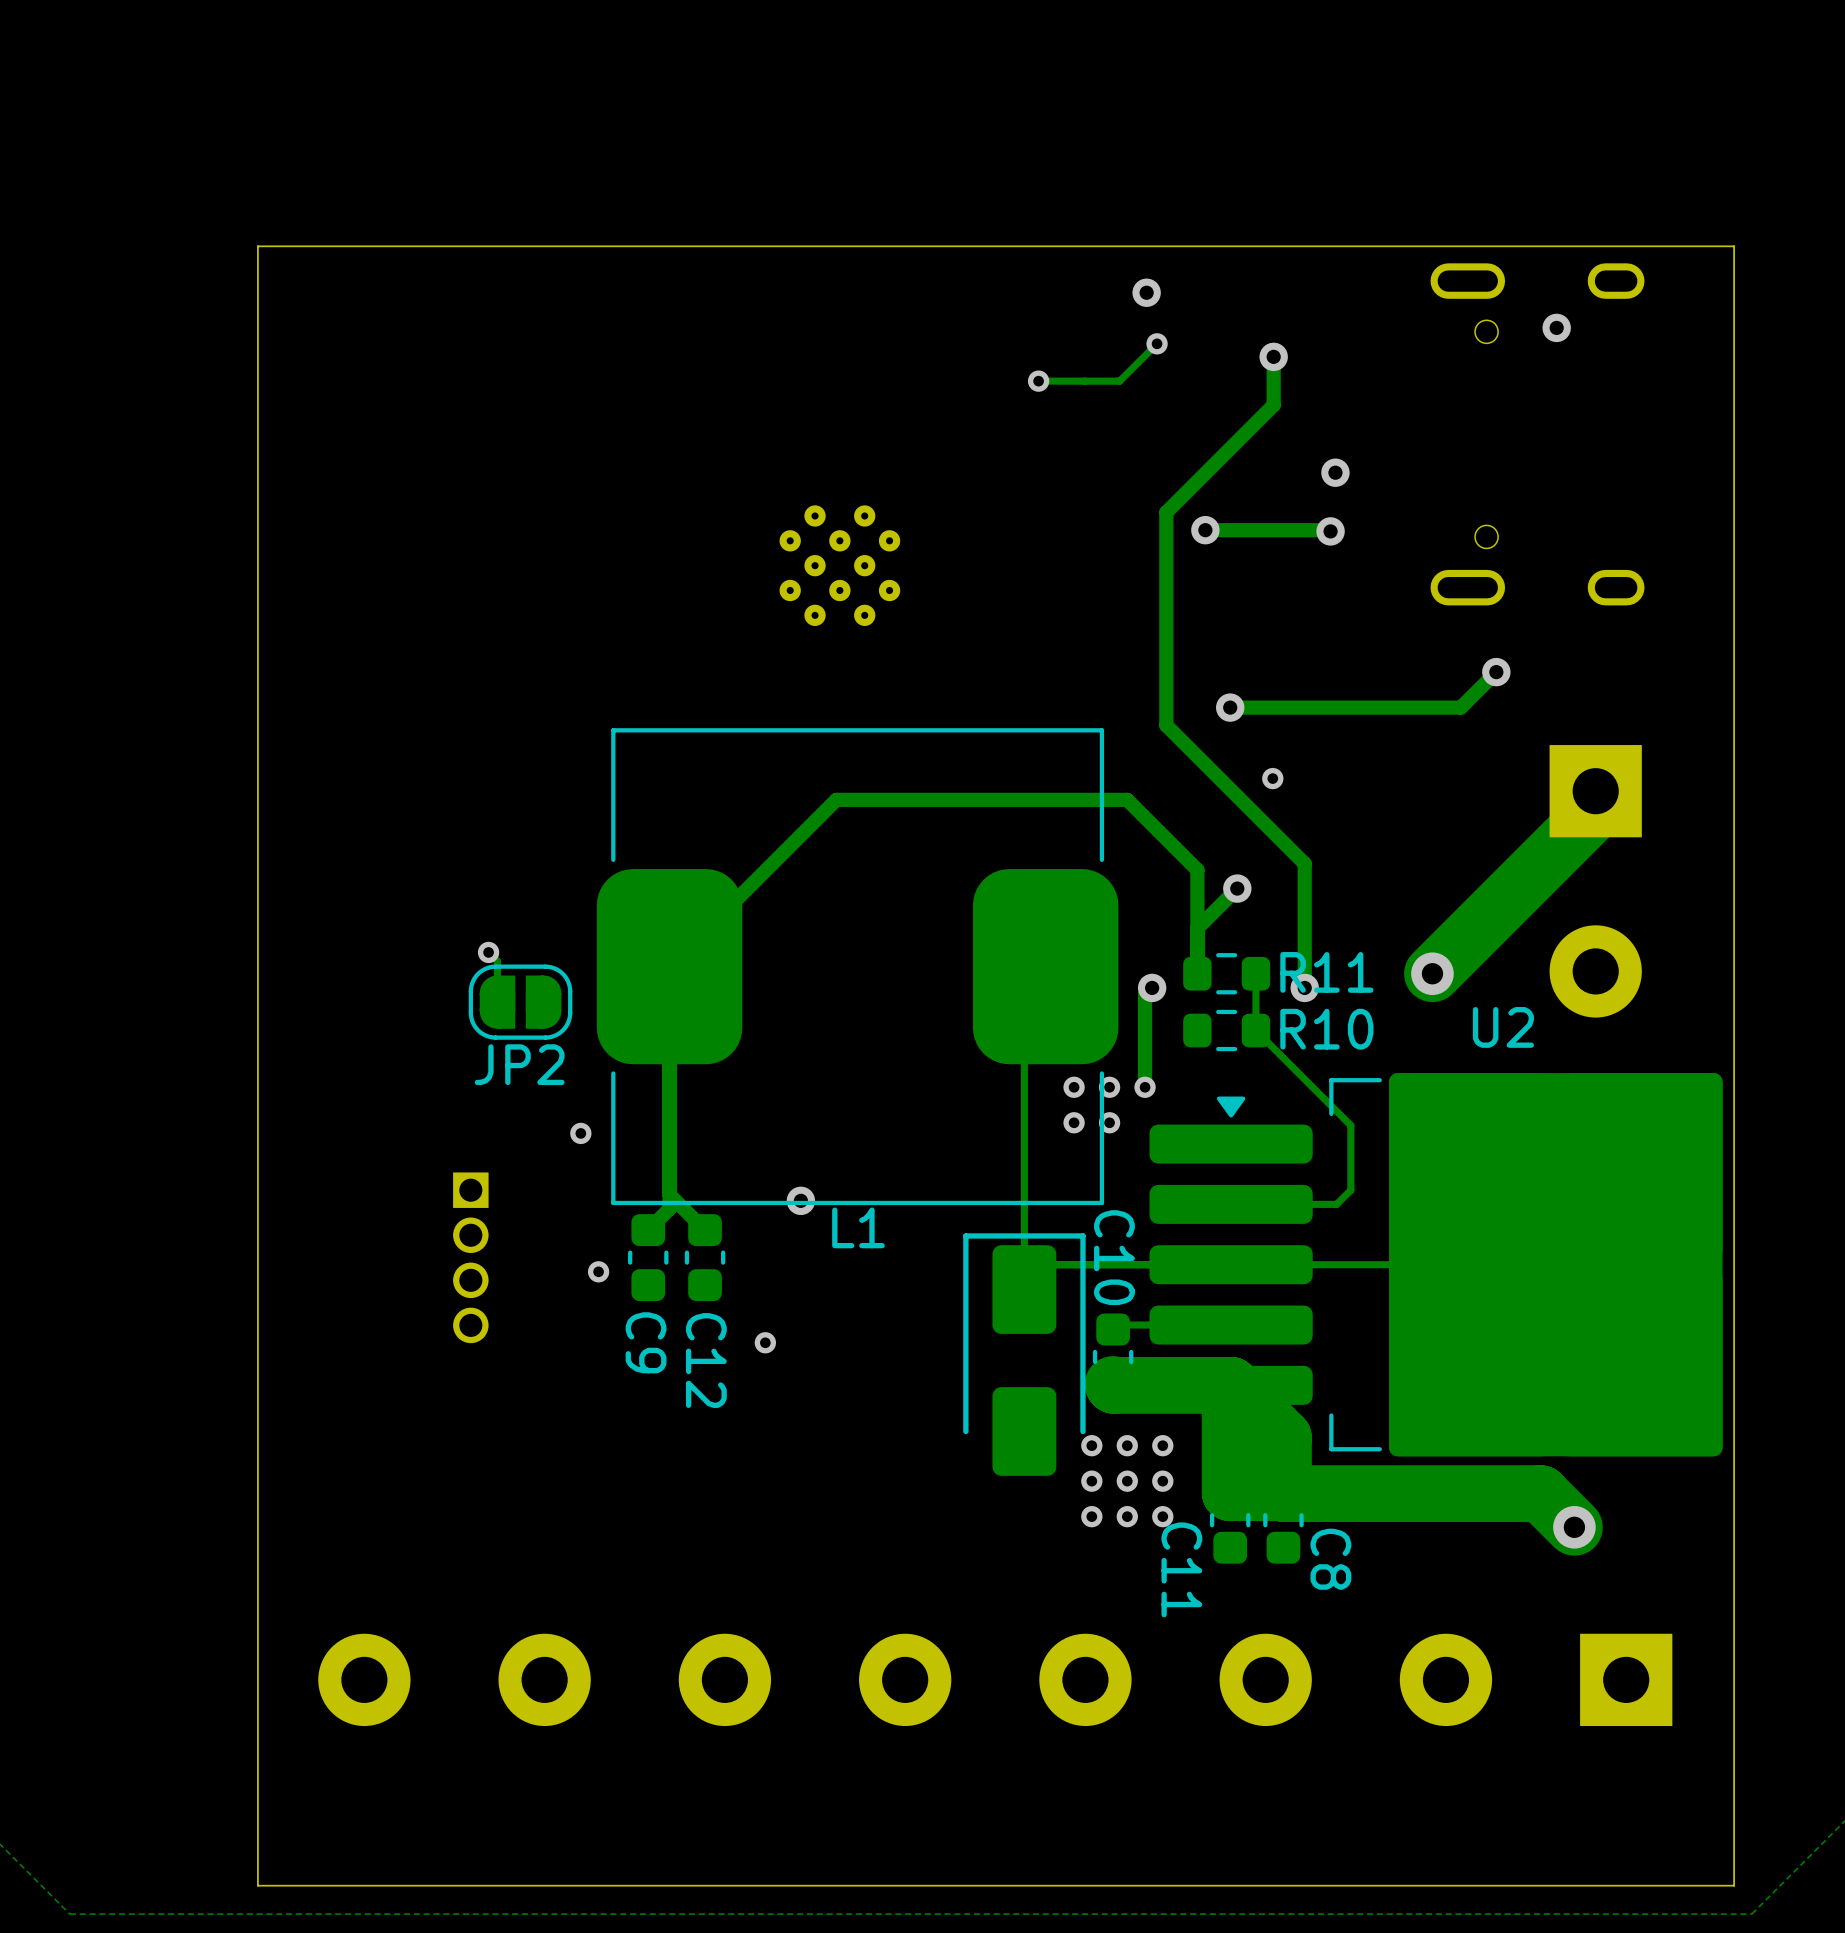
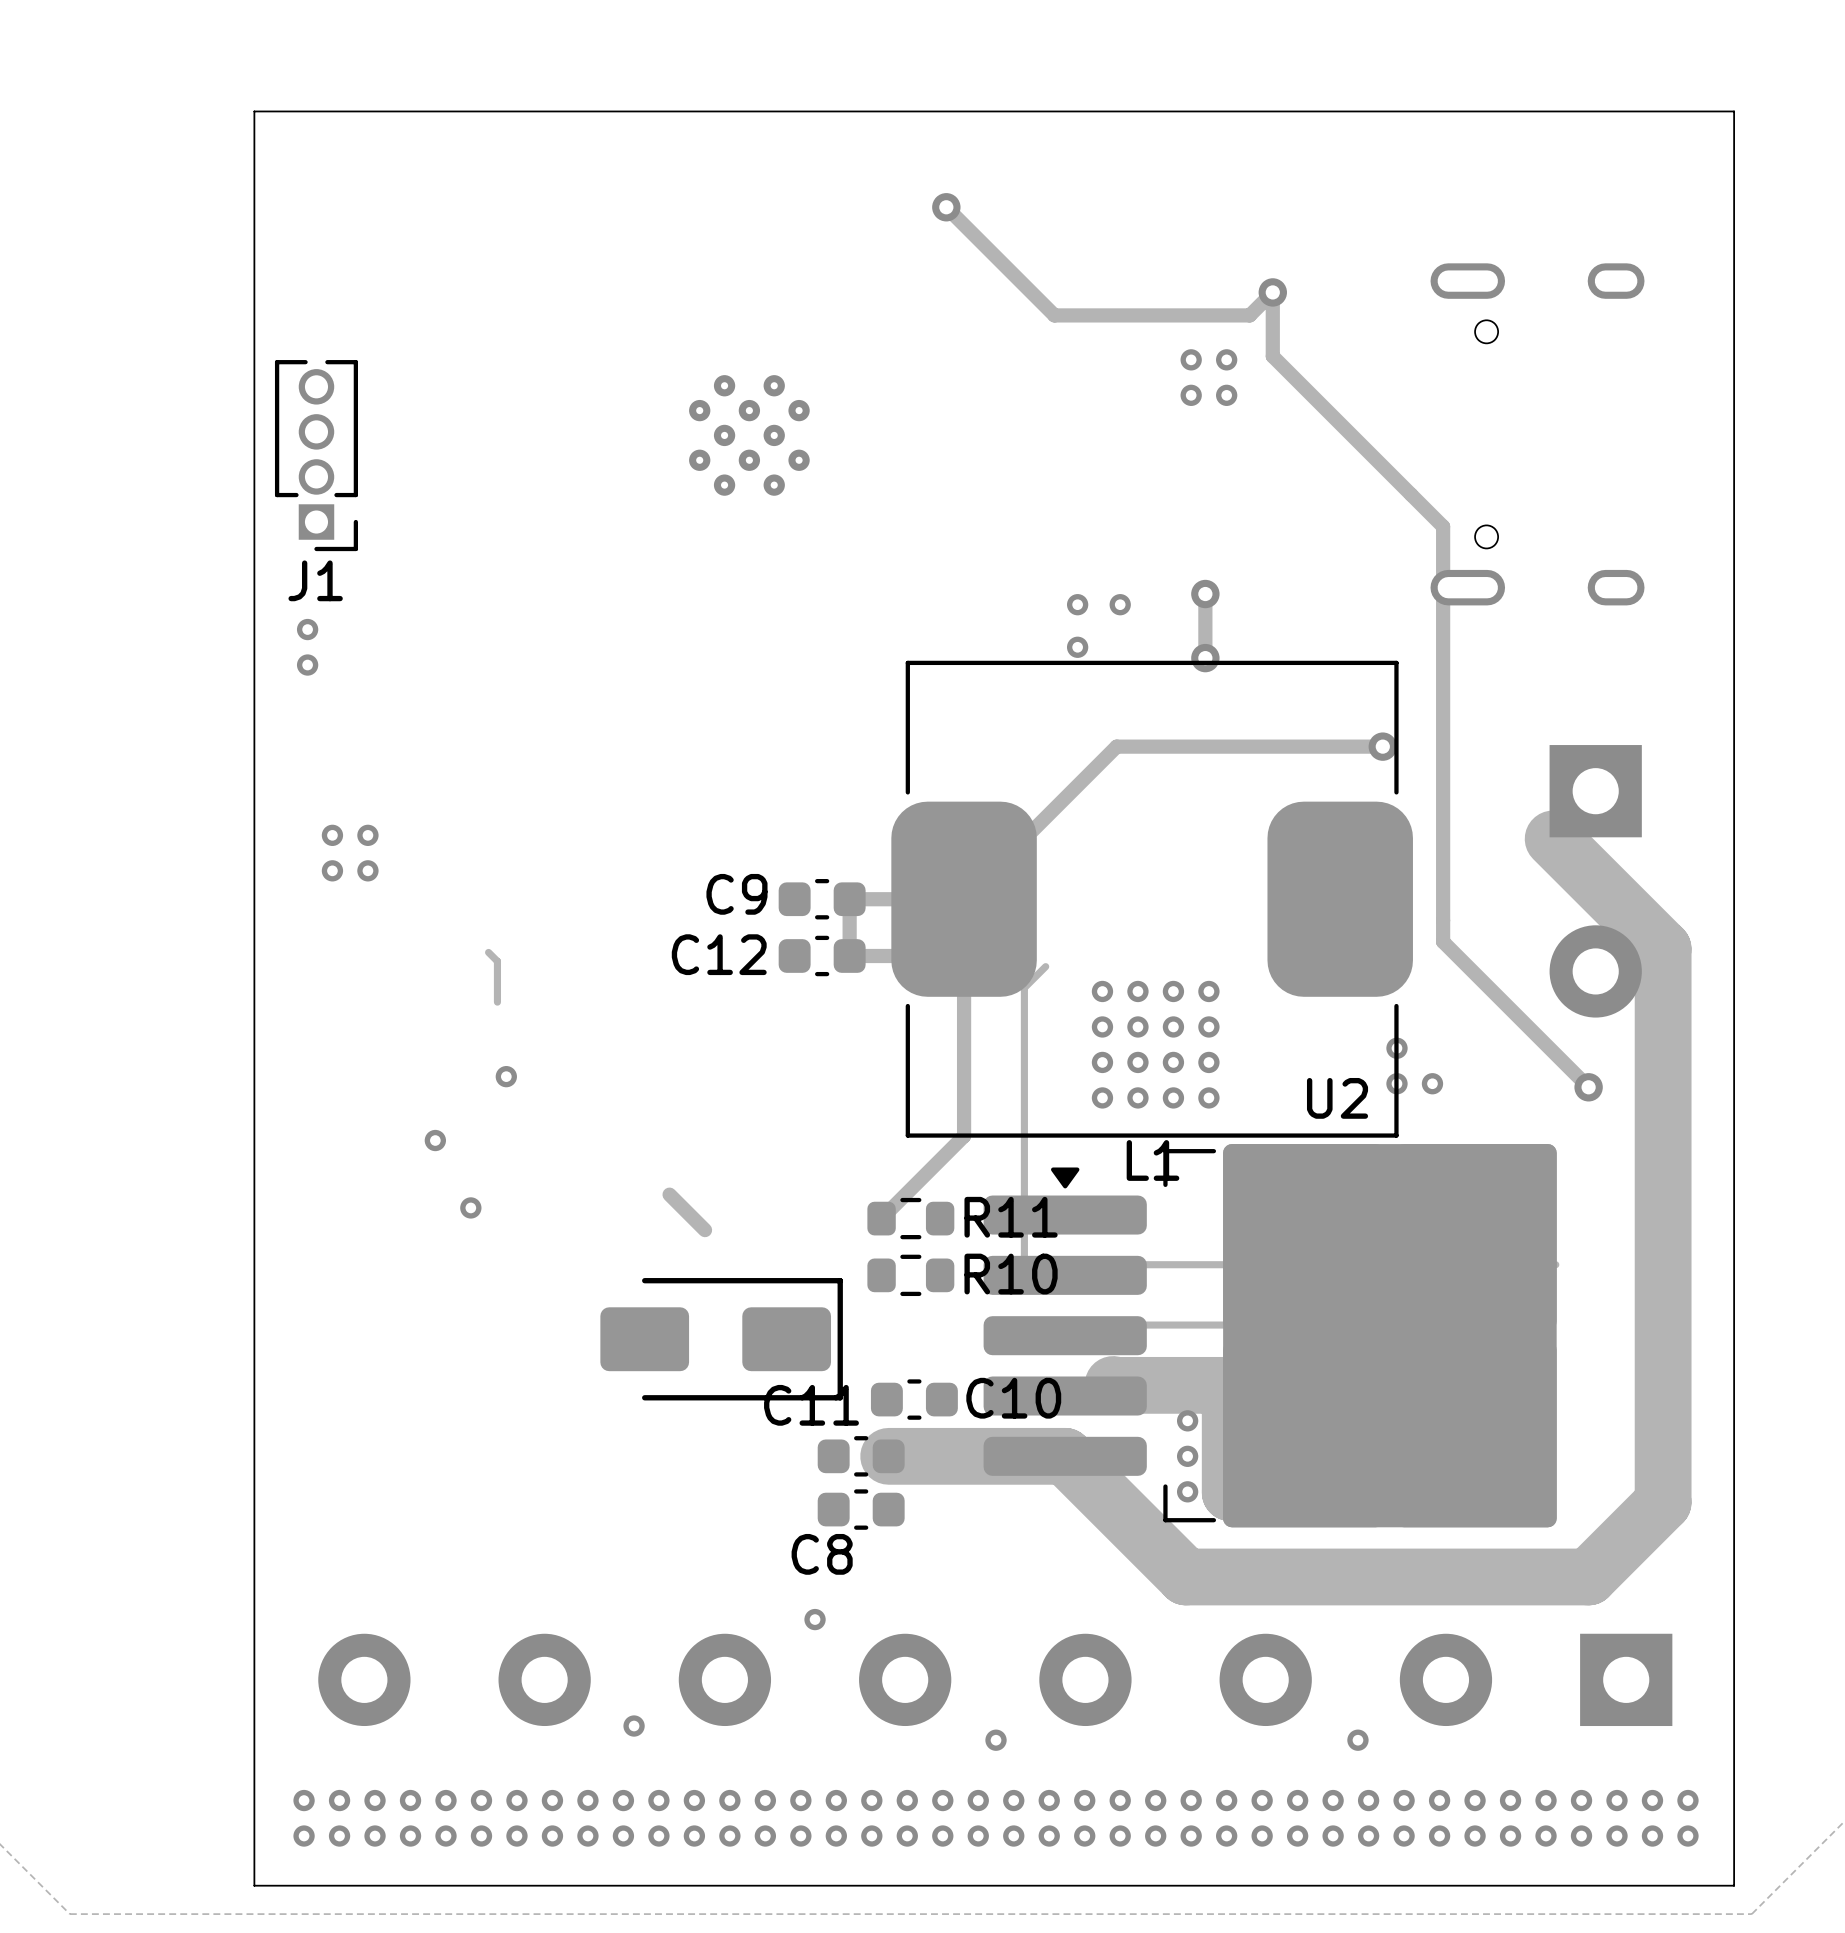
track: none -> (946, 207) (1054, 315) (1249, 315) (1272, 292) (1272, 356) (1443, 526) (1443, 941) (1588, 1087)
via: none -> (946, 207)
board edge: (1734, 246) (257, 246) (257, 1885) -> (1734, 246) (1734, 111) (254, 111) (254, 1885) (257, 1885)
via: (1146, 292) -> none
via: none -> (1272, 292)
via: (1556, 327) -> none
track: (1157, 343) (1119, 381) (1038, 381) -> none
via: (1157, 343) -> none
track: (1273, 356) (1273, 405) (1166, 512) (1166, 725) (1304, 863) (1304, 987) -> none
via: (1273, 356) -> none
via: none -> (1191, 359)
via: none -> (1226, 359)
via: (1038, 381) -> none
via: none -> (1191, 395)
via: none -> (1226, 395)
via: (1335, 472) -> none
track: (1205, 530) (1330, 531) -> none
via: (1205, 530) -> none
via: (1330, 531) -> none
part position: (839, 565) -> (749, 435)
track: none -> (1205, 594) (1205, 658)
via: none -> (1205, 594)
via: none -> (1077, 604)
via: none -> (1120, 604)
via: none -> (307, 629)
via: none -> (1077, 647)
via: none -> (307, 665)
track: (1496, 672) (1460, 707) (1230, 707) -> none
via: (1496, 672) -> none
via position: (1230, 707) -> (1205, 658)
track: none -> (1382, 746) (1116, 746) (907, 956) (849, 956) (849, 899) (964, 899) (964, 1136) (881, 1218)
via: none -> (1382, 746)
via: (1272, 778) -> none
track: (1595, 791) (1595, 810) (1432, 973) -> none
via: none -> (332, 835)
via: none -> (367, 835)
track: none -> (1553, 838) (1663, 948) (1663, 1502) (1588, 1576) (1185, 1576) (1065, 1456) (888, 1456)
via: none -> (332, 870)
via: none -> (367, 870)
track: (1237, 888) (1197, 928) -> none
via: (1237, 888) -> none
via: (488, 952) -> none
L1 position: (857, 966) -> (1152, 899)
track: (1197, 973) (1197, 869) (1127, 799) (836, 799) (669, 966) (669, 1208) (648, 1230) -> none
R11 position: (1226, 973) -> (910, 1218)
track: (1255, 973) (1255, 1030) (1350, 1125) (1350, 1190) (1336, 1204) (1231, 1204) -> none
via: (1432, 973) -> none
track: (1152, 987) (1145, 995) (1145, 1087) -> none
via: (1152, 987) -> none
via: (1304, 987) -> none
via: none -> (1102, 991)
via: none -> (1137, 991)
via: none -> (1173, 991)
via: none -> (1208, 991)
JP2: (520, 1002) -> none
via: none -> (1102, 1026)
via: none -> (1137, 1026)
via: none -> (1173, 1026)
via: none -> (1208, 1026)
R10 position: (1226, 1030) -> (910, 1275)
via: none -> (1396, 1048)
via: none -> (1102, 1062)
via: none -> (1137, 1062)
via: none -> (1173, 1062)
via: none -> (1208, 1062)
via: none -> (506, 1076)
via: none -> (1396, 1083)
via: none -> (1432, 1083)
via: (1074, 1087) -> none
via position: (1109, 1087) -> (1102, 1097)
via position: (1145, 1087) -> (1137, 1097)
via: none -> (1588, 1087)
via: none -> (1173, 1097)
via: none -> (1208, 1097)
via: (1074, 1122) -> none
via: (1109, 1122) -> none
via: (580, 1133) -> none
via: none -> (435, 1140)
via: (800, 1200) -> none
via: none -> (470, 1207)
J1 side: top (470, 1257) -> bottom (316, 455)
C9 rotation: 0° (648, 1257) -> 90° clockwise (822, 899)
C9 position: (648, 1257) -> (822, 899)
C12 rotation: 0° (705, 1257) -> 90° clockwise (822, 956)
C12 position: (705, 1257) -> (822, 956)
U2 position: (1436, 1264) -> (1270, 1335)
via: (598, 1271) -> none
via: (765, 1342) -> none
part rotation: 0° (1024, 1354) -> 90° clockwise (721, 1339)
part position: (1024, 1354) -> (721, 1339)
C10 rotation: 0° (1113, 1356) -> 90° clockwise (914, 1399)
C10 position: (1113, 1356) -> (914, 1399)
via: none -> (1187, 1420)
via: (1091, 1445) -> none
via: (1127, 1445) -> none
via: (1162, 1445) -> none
via: none -> (1187, 1456)
via: (1091, 1481) -> none
via: (1127, 1481) -> none
via: (1162, 1481) -> none
via: none -> (1187, 1491)
track: (1283, 1492) (1540, 1493) (1574, 1527) -> none
via: (1091, 1516) -> none
via: (1127, 1516) -> none
via: (1162, 1516) -> none
C11 rotation: 0° (1230, 1520) -> 90° clockwise (861, 1456)
C11 position: (1230, 1520) -> (861, 1456)
C8 rotation: 0° (1283, 1520) -> 90° clockwise (861, 1509)
C8 position: (1283, 1520) -> (861, 1509)
via: (1574, 1527) -> none
via: none -> (815, 1619)
via: none -> (634, 1726)
via: none -> (996, 1740)
via: none -> (1357, 1740)
via: none -> (304, 1800)
via: none -> (339, 1800)
via: none -> (375, 1800)
via: none -> (410, 1800)
via: none -> (446, 1800)
via: none -> (481, 1800)
via: none -> (516, 1800)
via: none -> (552, 1800)
via: none -> (587, 1800)
via: none -> (623, 1800)
via: none -> (658, 1800)
via: none -> (694, 1800)
via: none -> (729, 1800)
via: none -> (765, 1800)
via: none -> (800, 1800)
via: none -> (836, 1800)
via: none -> (871, 1800)
via: none -> (907, 1800)
via: none -> (942, 1800)
via: none -> (978, 1800)
via: none -> (1013, 1800)
via: none -> (1049, 1800)
via: none -> (1084, 1800)
via: none -> (1120, 1800)
via: none -> (1155, 1800)
via: none -> (1191, 1800)
via: none -> (1226, 1800)
via: none -> (1262, 1800)
via: none -> (1297, 1800)
via: none -> (1333, 1800)
via: none -> (1368, 1800)
via: none -> (1404, 1800)
via: none -> (1439, 1800)
via: none -> (1475, 1800)
via: none -> (1510, 1800)
via: none -> (1546, 1800)
via: none -> (1581, 1800)
via: none -> (1617, 1800)
via: none -> (1652, 1800)
via: none -> (1687, 1800)
via: none -> (304, 1836)
via: none -> (339, 1836)
via: none -> (375, 1836)
via: none -> (410, 1836)
via: none -> (446, 1836)
via: none -> (481, 1836)
via: none -> (516, 1836)
via: none -> (552, 1836)
via: none -> (587, 1836)
via: none -> (623, 1836)
via: none -> (658, 1836)
via: none -> (694, 1836)
via: none -> (729, 1836)
via: none -> (765, 1836)
via: none -> (800, 1836)
via: none -> (836, 1836)
via: none -> (871, 1836)
via: none -> (907, 1836)
via: none -> (942, 1836)
via: none -> (978, 1836)
via: none -> (1013, 1836)
via: none -> (1049, 1836)
via: none -> (1084, 1836)
via: none -> (1120, 1836)
via: none -> (1155, 1836)
via: none -> (1191, 1836)
via: none -> (1226, 1836)
via: none -> (1262, 1836)
via: none -> (1297, 1836)
via: none -> (1333, 1836)
via: none -> (1368, 1836)
via: none -> (1404, 1836)
via: none -> (1439, 1836)
via: none -> (1475, 1836)
via: none -> (1510, 1836)
via: none -> (1546, 1836)
via: none -> (1581, 1836)
via: none -> (1617, 1836)
via: none -> (1652, 1836)
via: none -> (1687, 1836)

